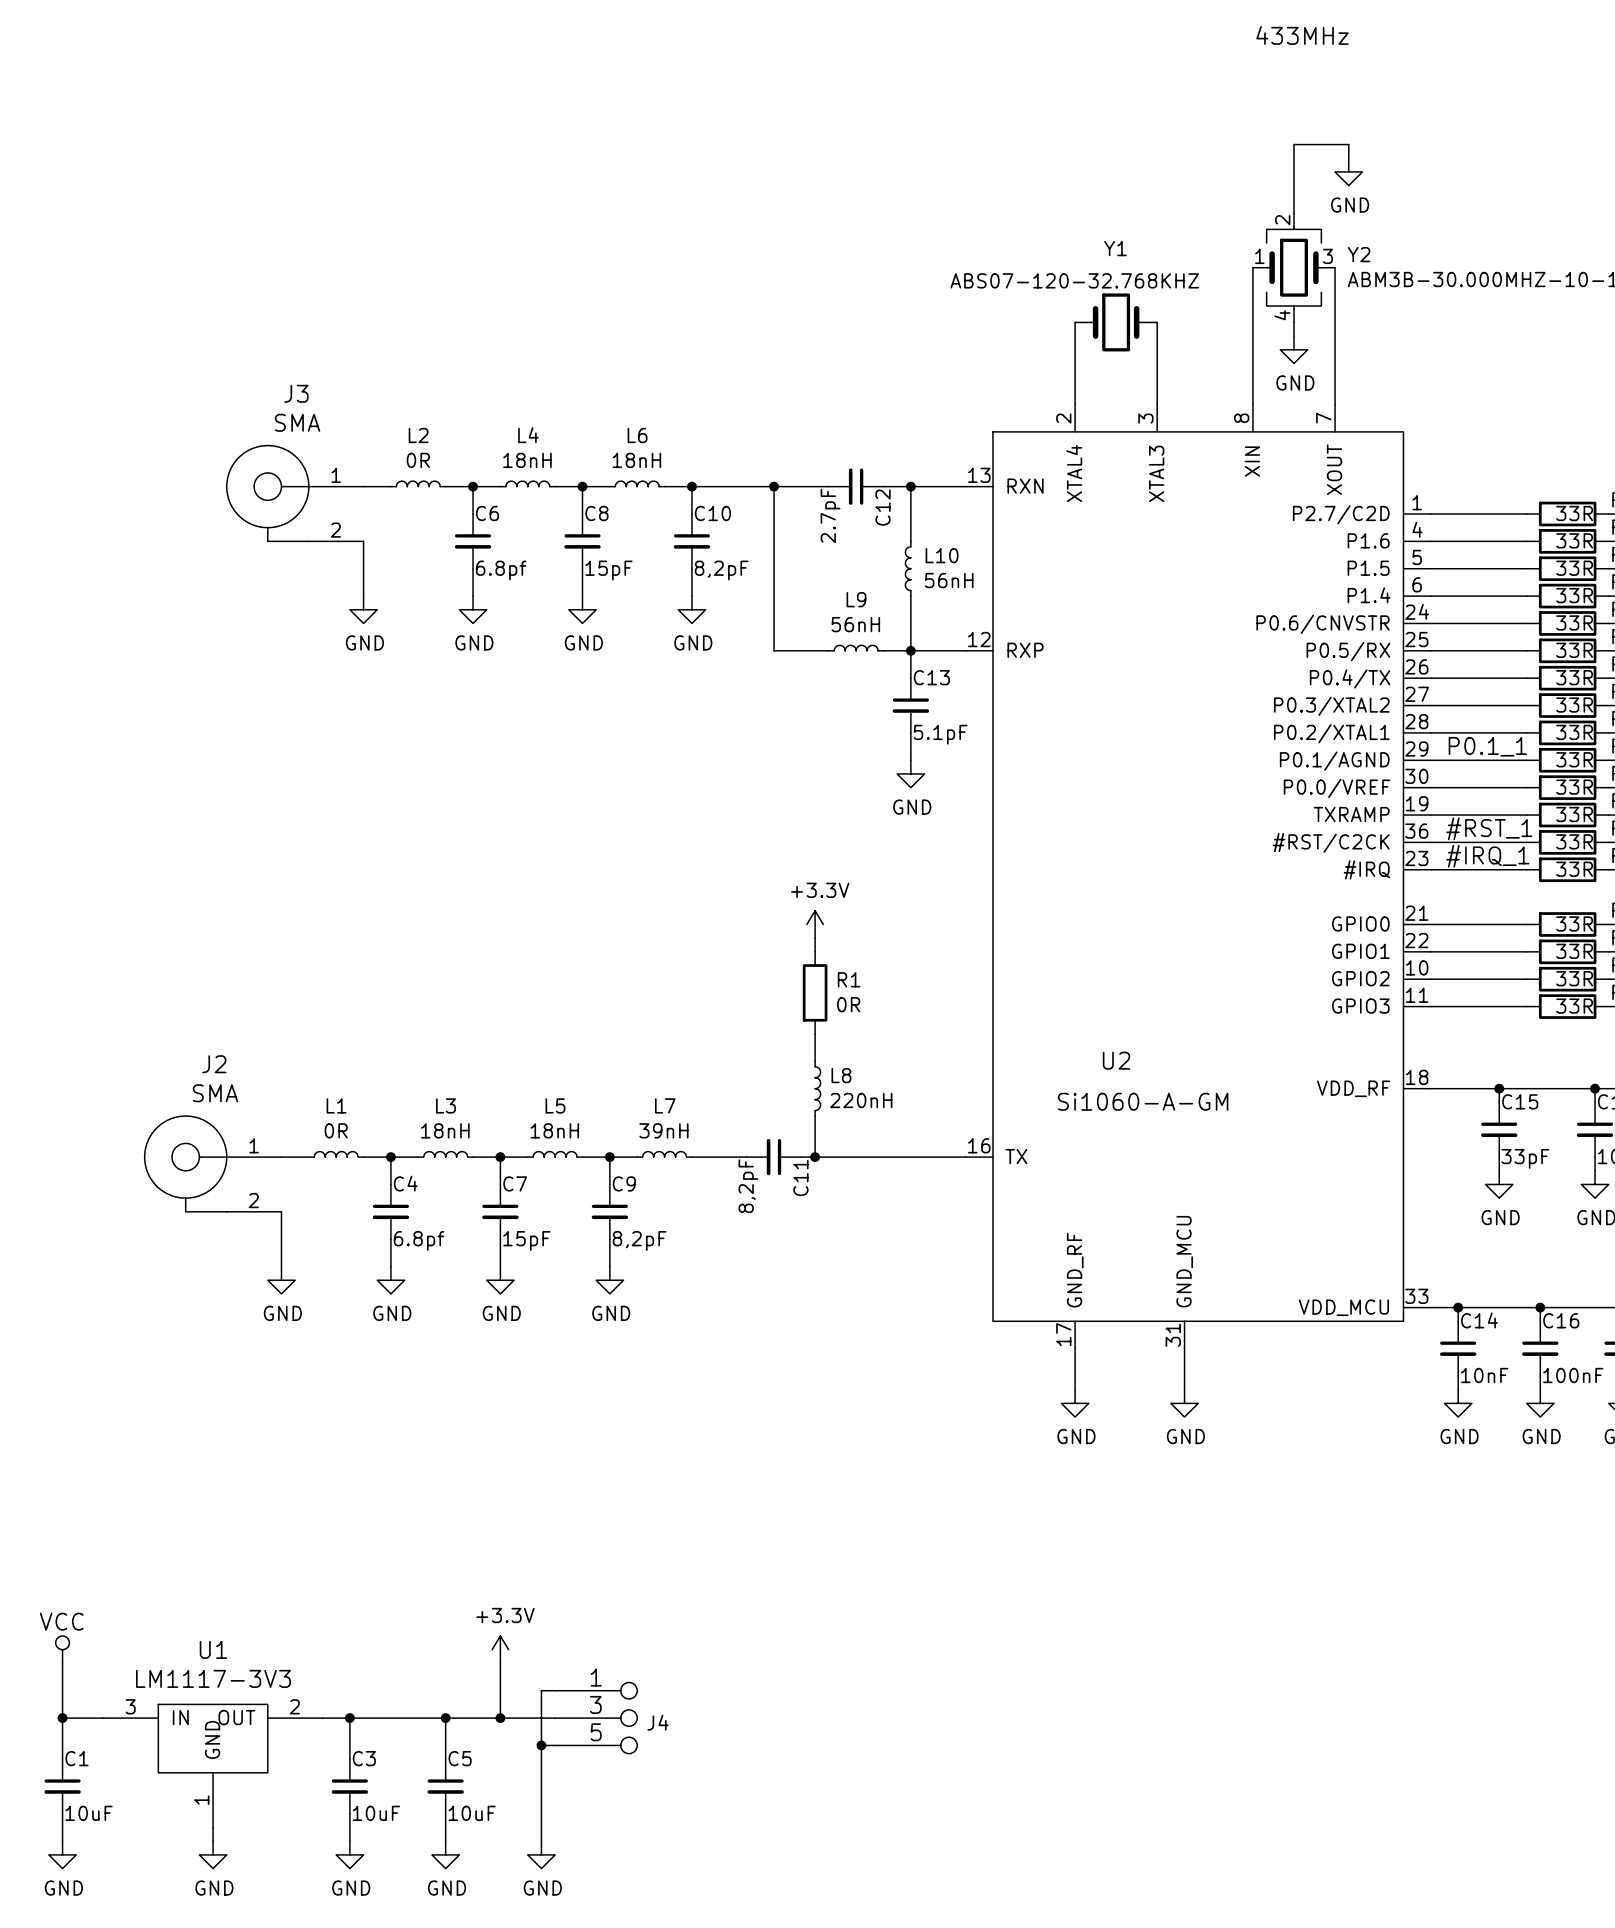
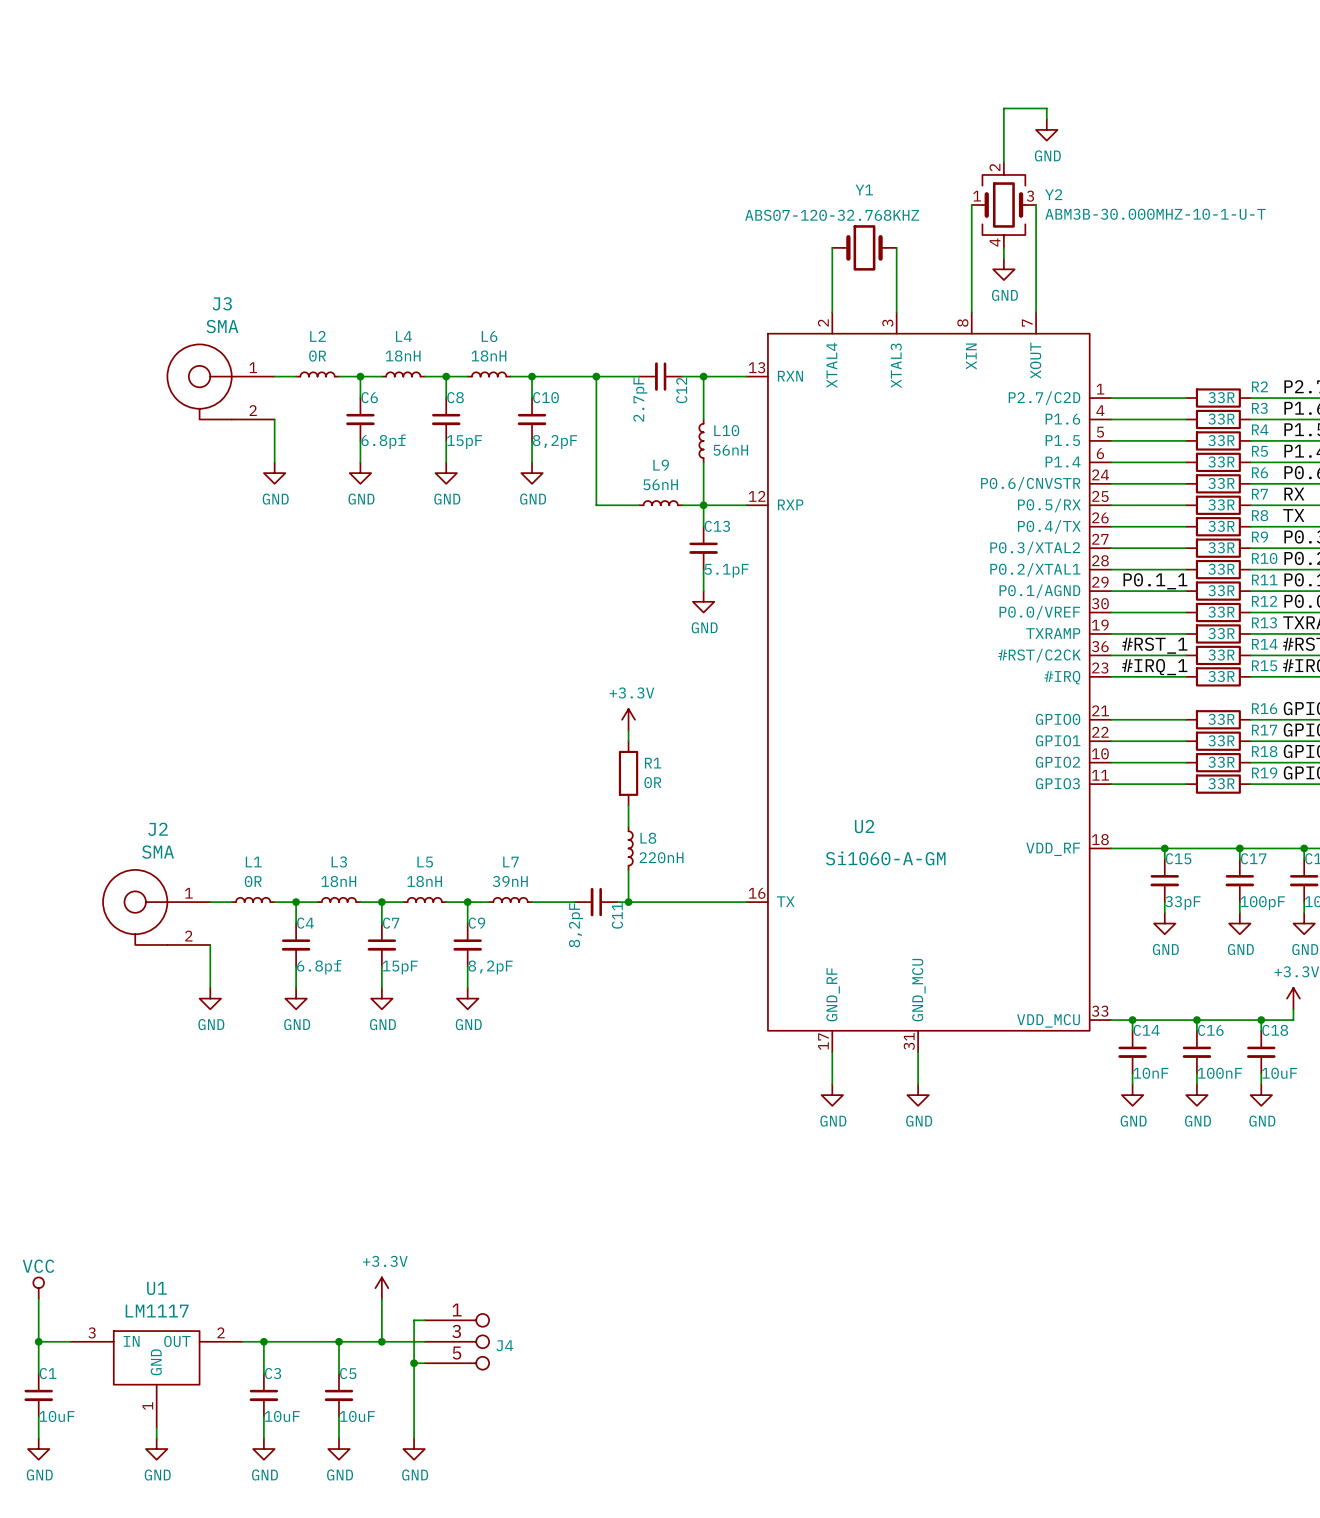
text: 433MHz (1302, 35) -> none
U1 value: LM1117-3V3 (213, 1678) -> LM1117 (157, 1311)

